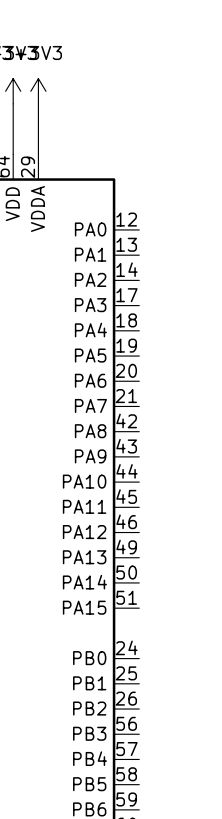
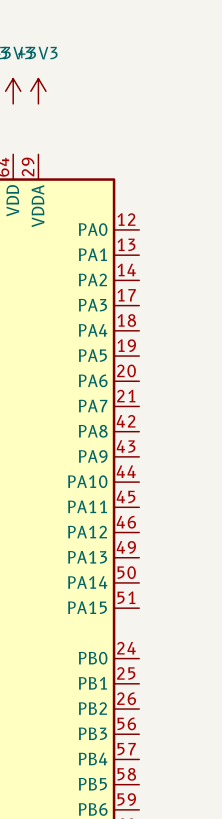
wire: (13, 103) (13, 154) -> none
wire: (38, 103) (38, 154) -> none

